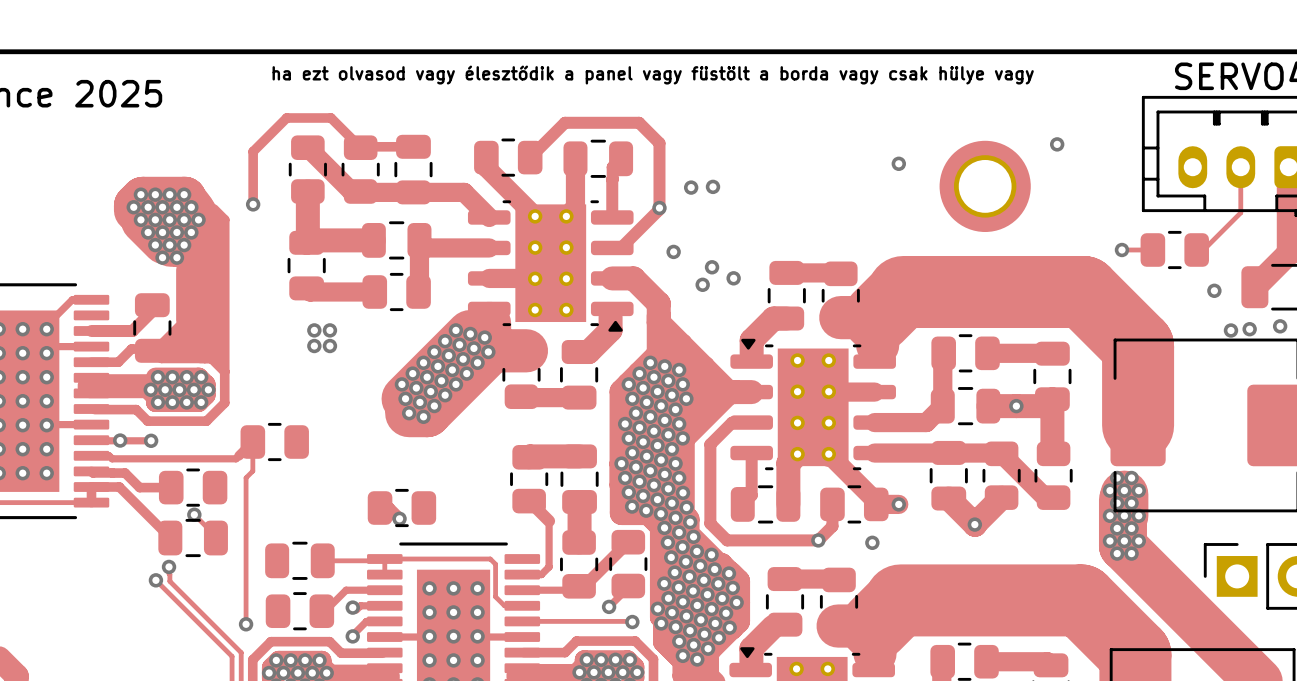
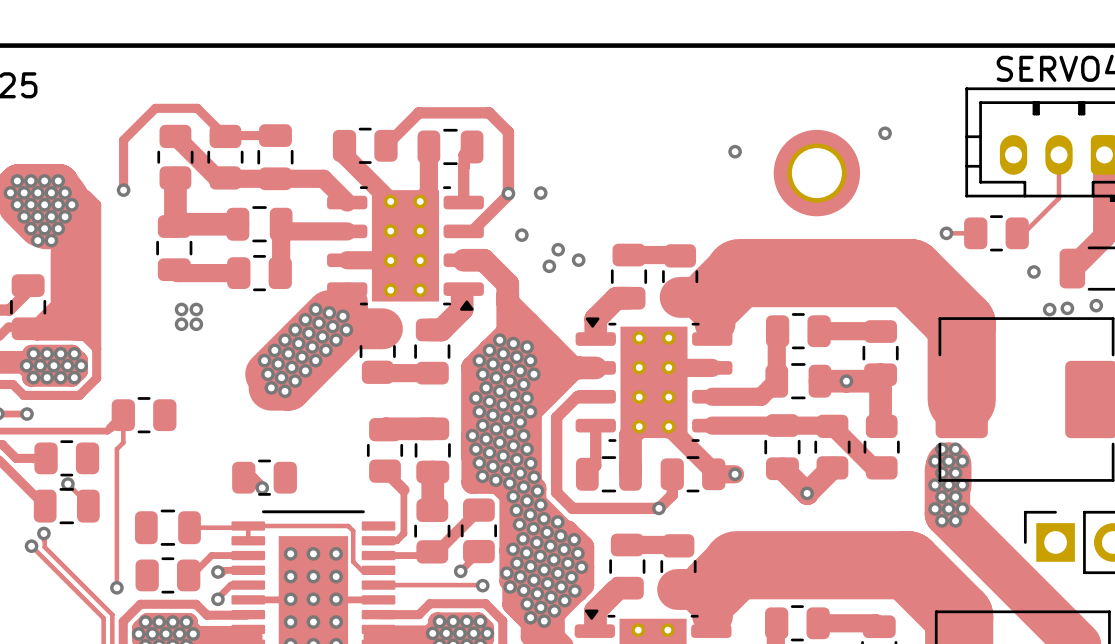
text: ha ezt olvasod vagy élesztődik a panel vagy füstölt a borda vagy csak hülye vagy (653, 75) -> none
via: (712, 186) -> none
via: (691, 187) -> none
via: none -> (540, 193)
via: (872, 542) -> none

